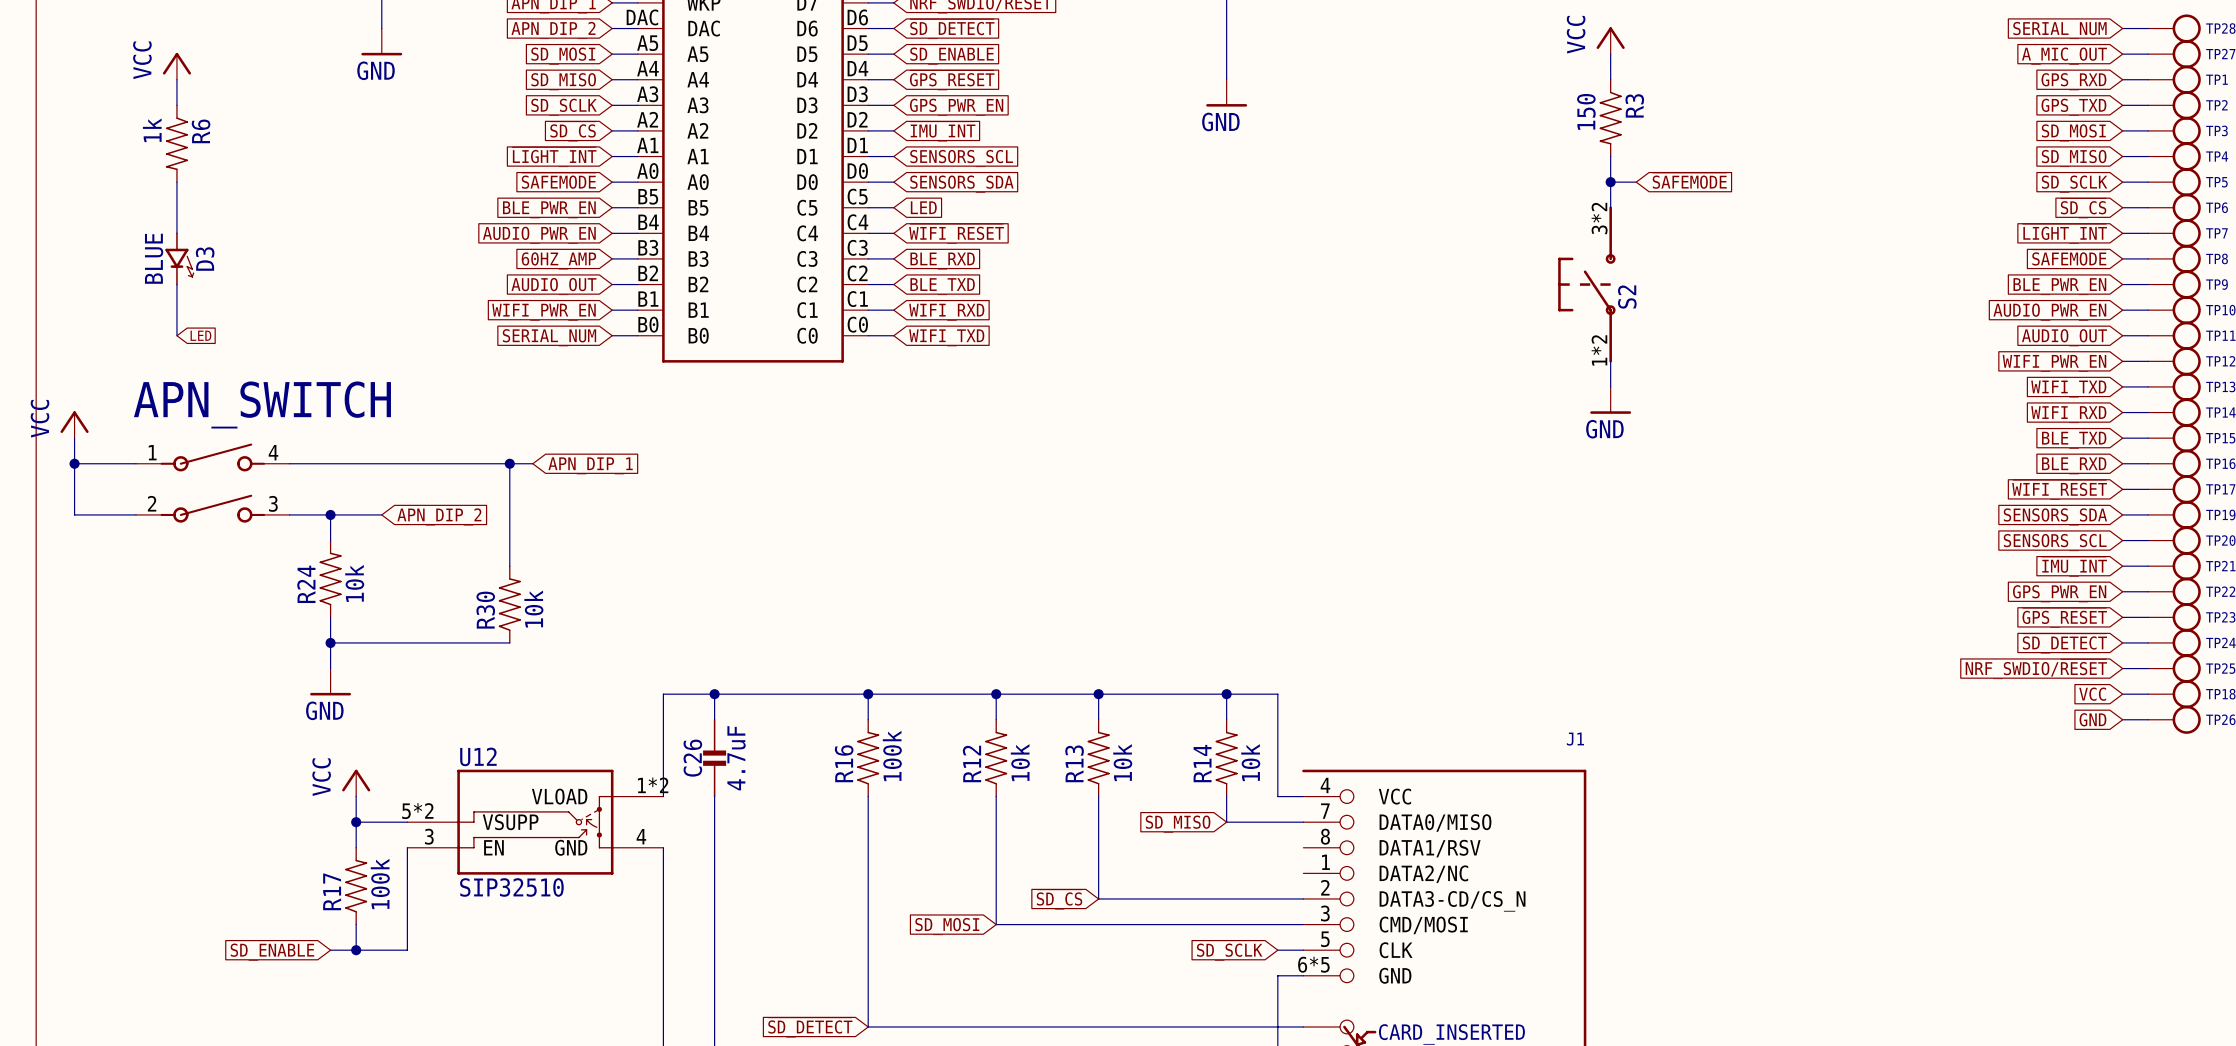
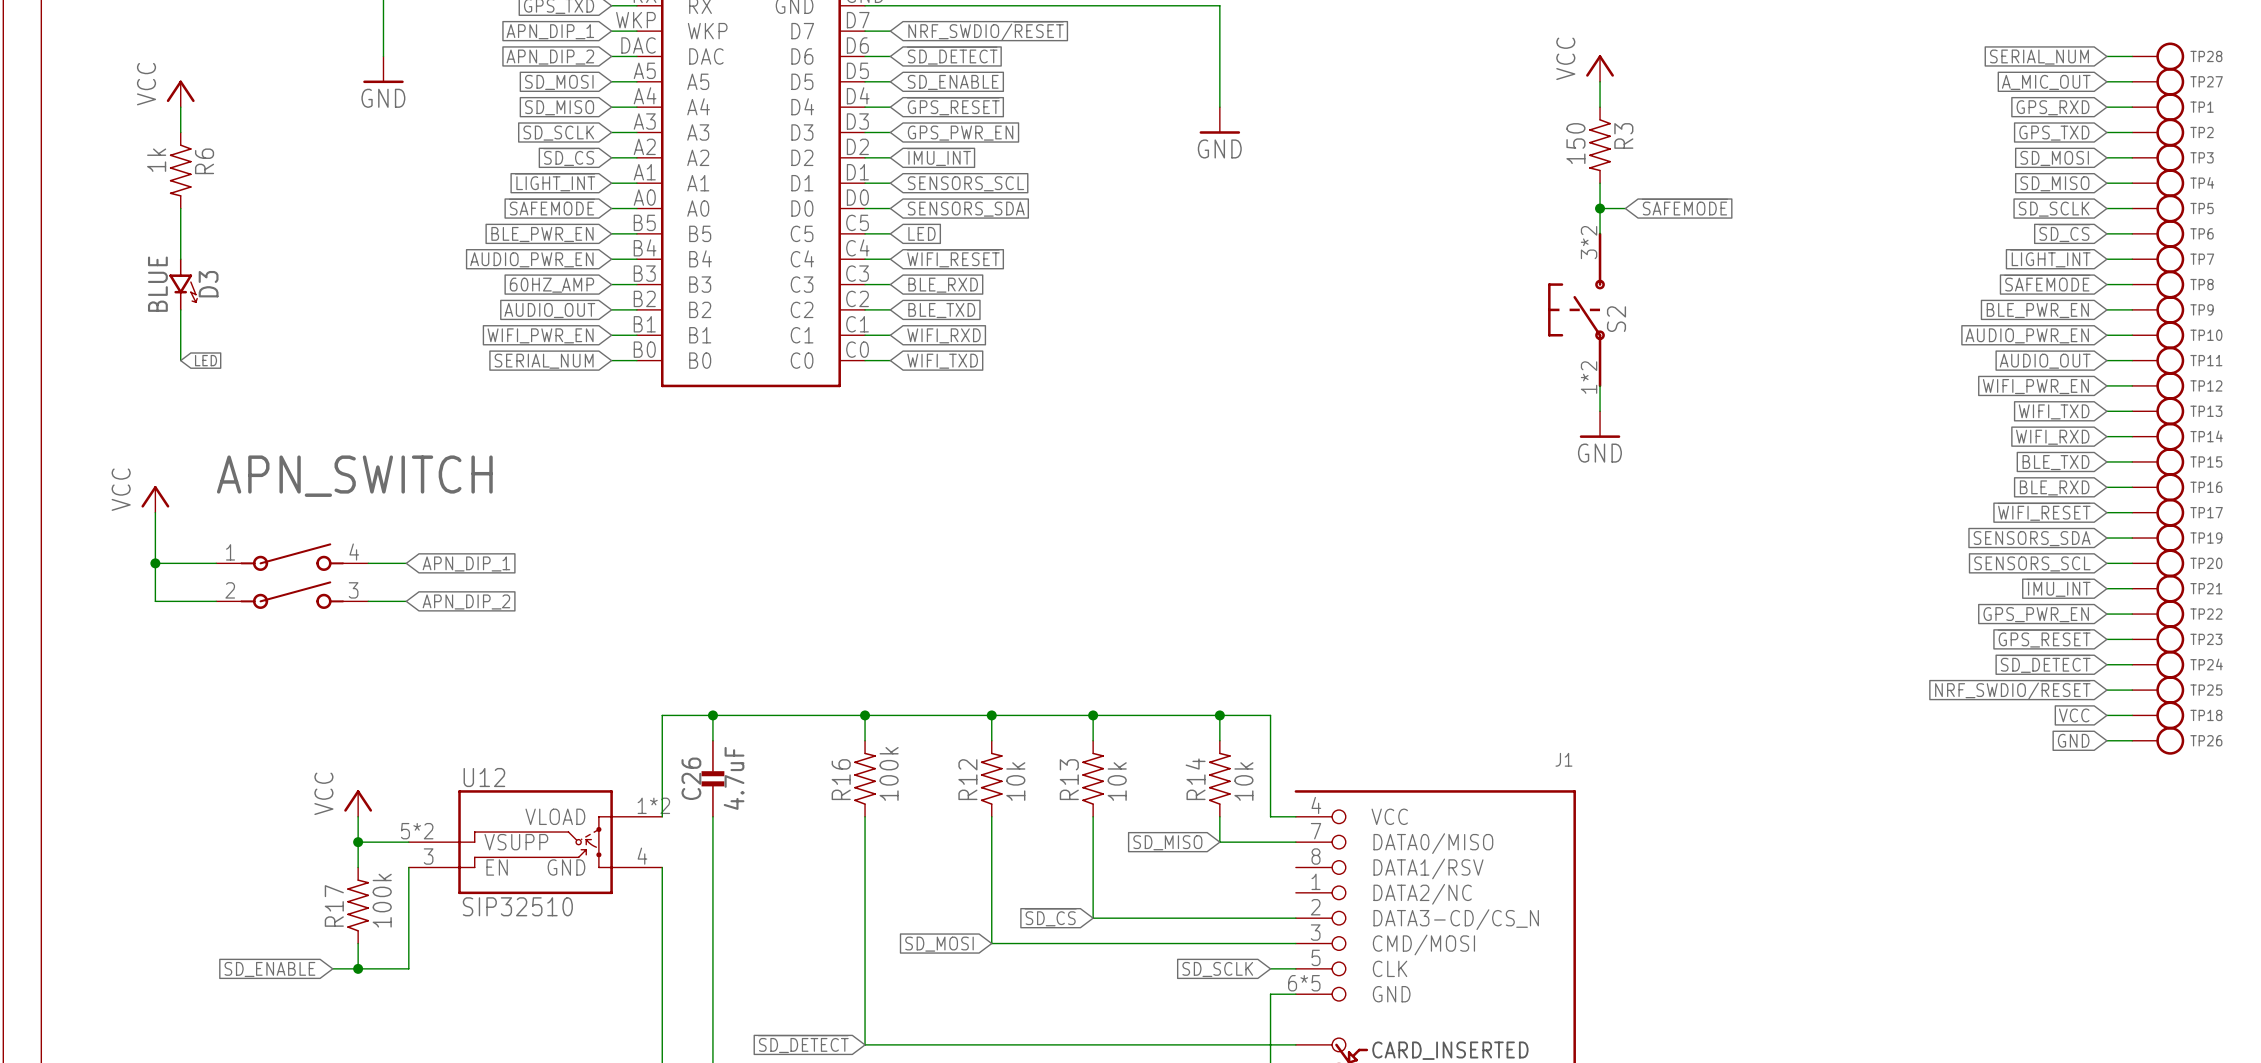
power symbol position: VCC (74, 424) -> VCC (155, 499)
wire: (74, 438) (74, 514) (136, 514) -> none
wire: (74, 463) (136, 463) -> (155, 563) (216, 563)
junction: (74, 463) -> none
wire: (289, 463) (532, 463) -> none
wire: (509, 463) (509, 566) -> none
junction: (509, 463) -> none
global label position: APN_DIP_1 (590, 465) -> APN_DIP_1 (466, 563)
APN_SWITCH: (212, 483) -> none
wire: none -> (155, 512) (155, 601) (216, 601)
wire: (289, 514) (381, 514) -> none
wire: (330, 514) (330, 540) -> none
junction: (330, 514) -> none
global label position: APN_DIP_2 (439, 516) -> APN_DIP_2 (466, 601)
junction: none -> (155, 563)
wire: none -> (368, 563) (406, 563)
APN_SWITCH: none -> (292, 576)
R24: 10k (330, 578) -> none
wire: none -> (368, 601) (406, 601)
R30: 10k (509, 604) -> none
wire: (330, 617) (330, 668) -> none
wire: (330, 642) (509, 642) -> none
junction: (330, 642) -> none
power symbol: GND (330, 682) -> none

